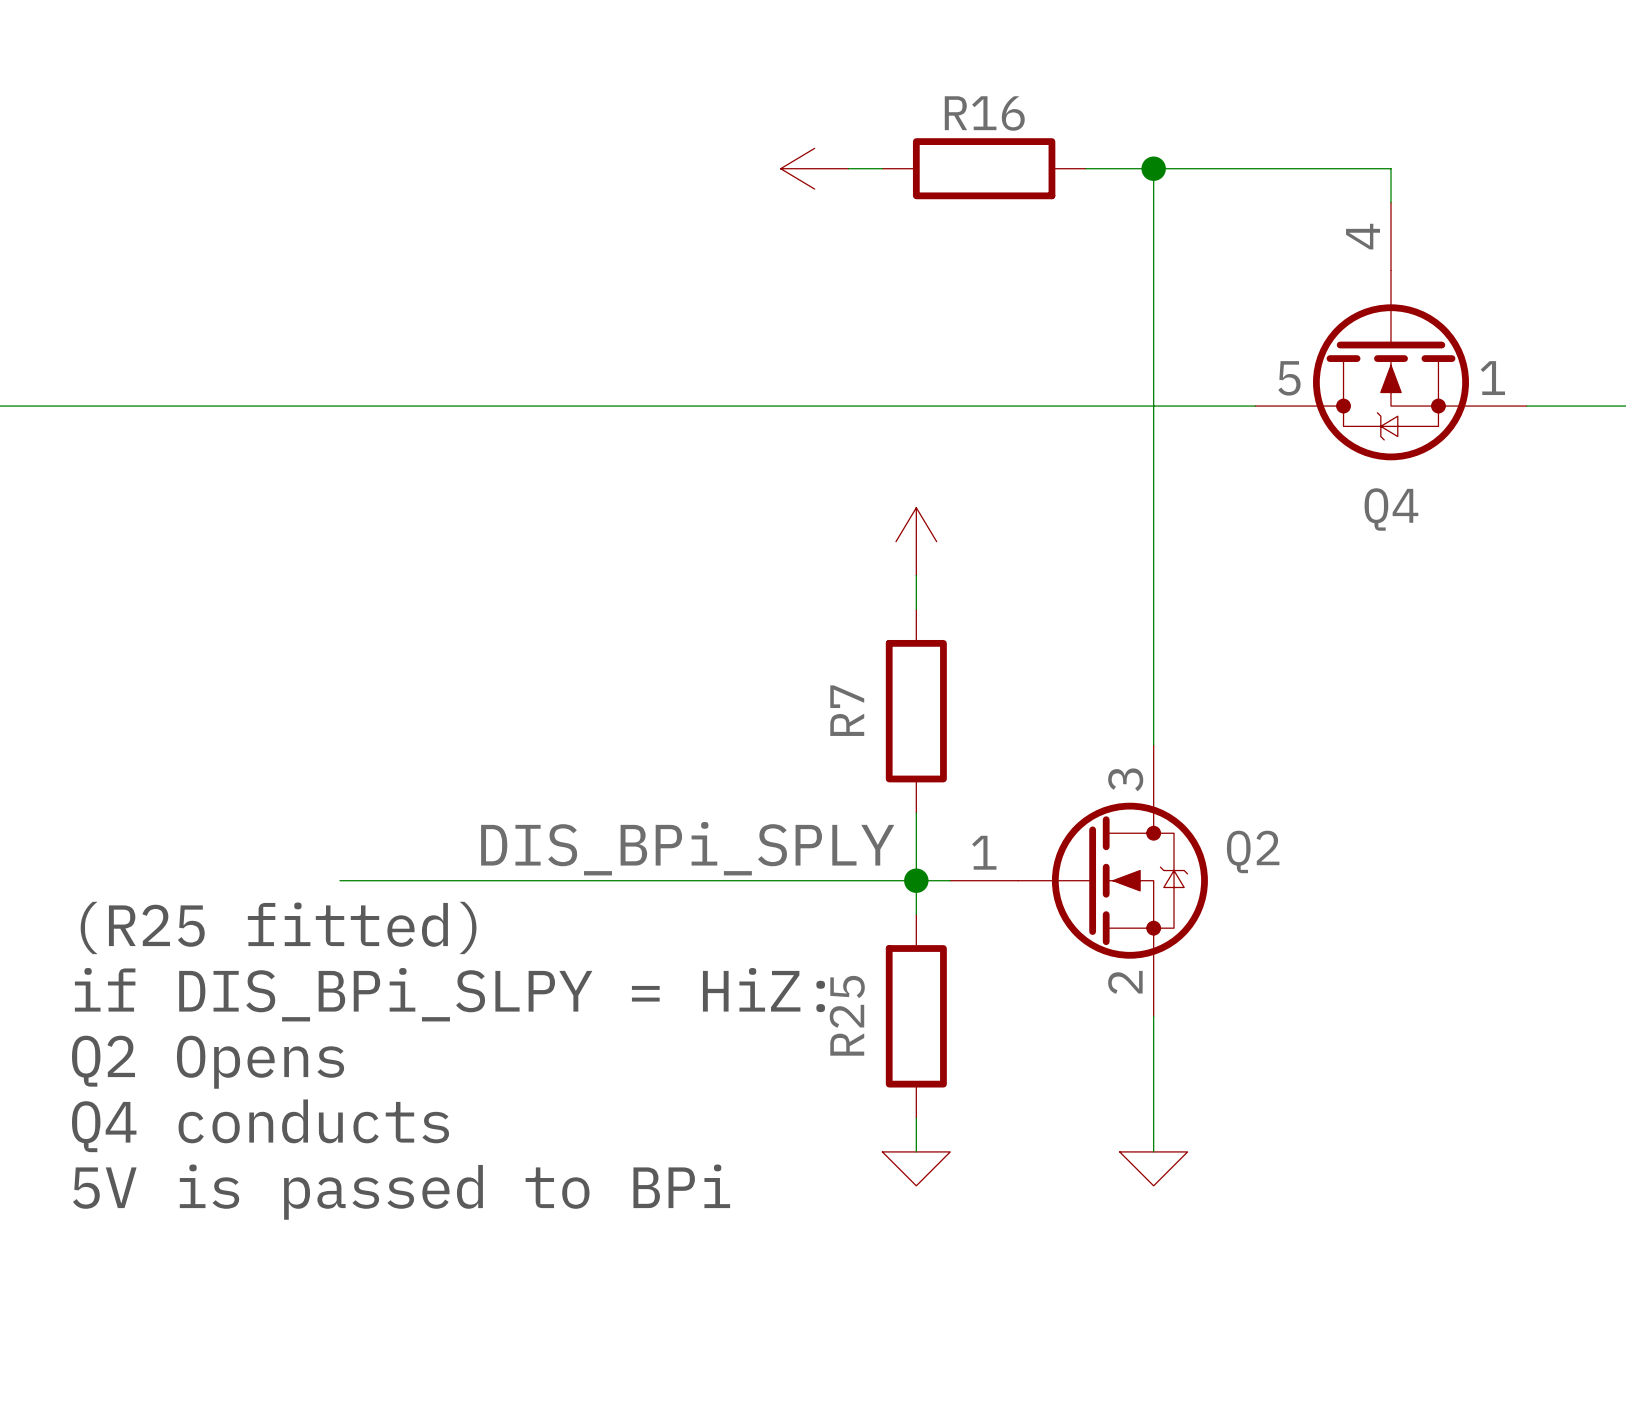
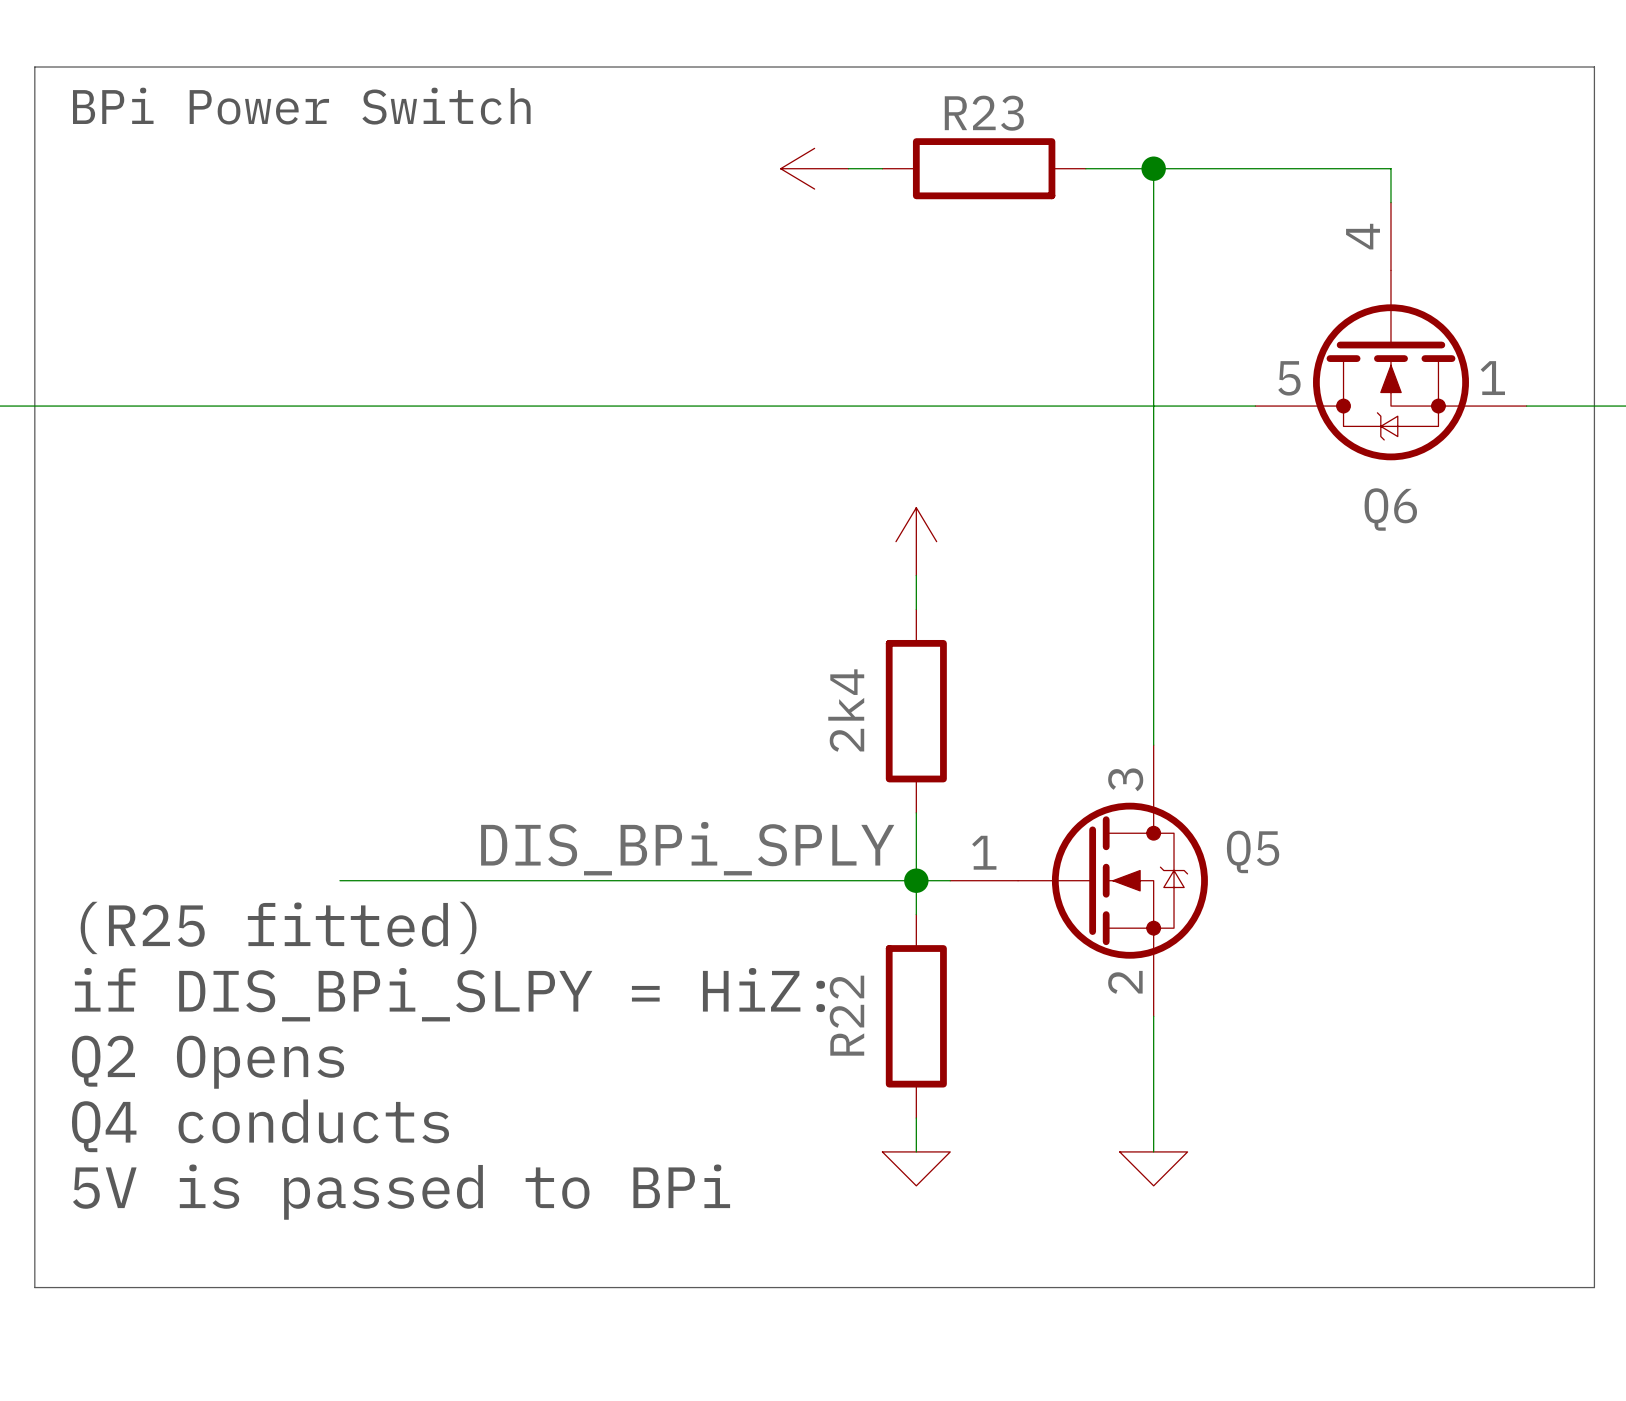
line: none -> (34, 67) (34, 1287) (1594, 1287) (1594, 67) (34, 67)
text: none -> BPi Power Switch (301, 106)
R16 name: R16 (984, 113) -> R23 (984, 113)
Q4 name: Q4 (1391, 509) -> Q6 (1390, 509)
R7 name: R7 (847, 710) -> 2k4 (846, 710)
Q2 name: Q2 (1253, 851) -> Q5 (1253, 851)
R25 name: R25 (847, 1015) -> R22 (846, 1015)

